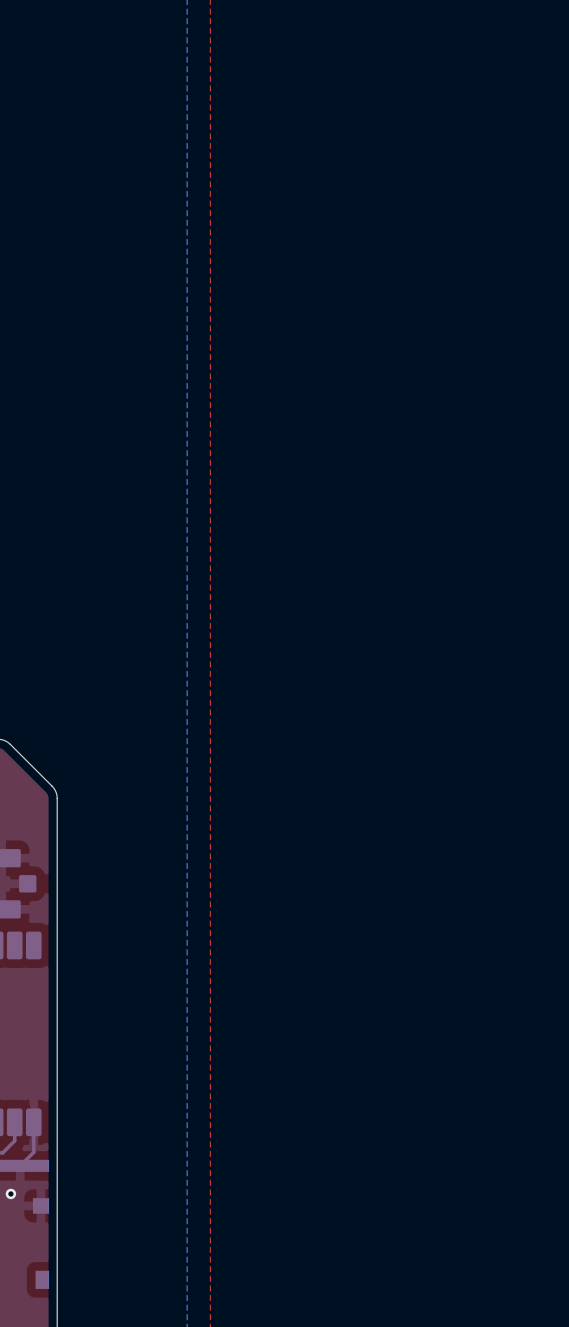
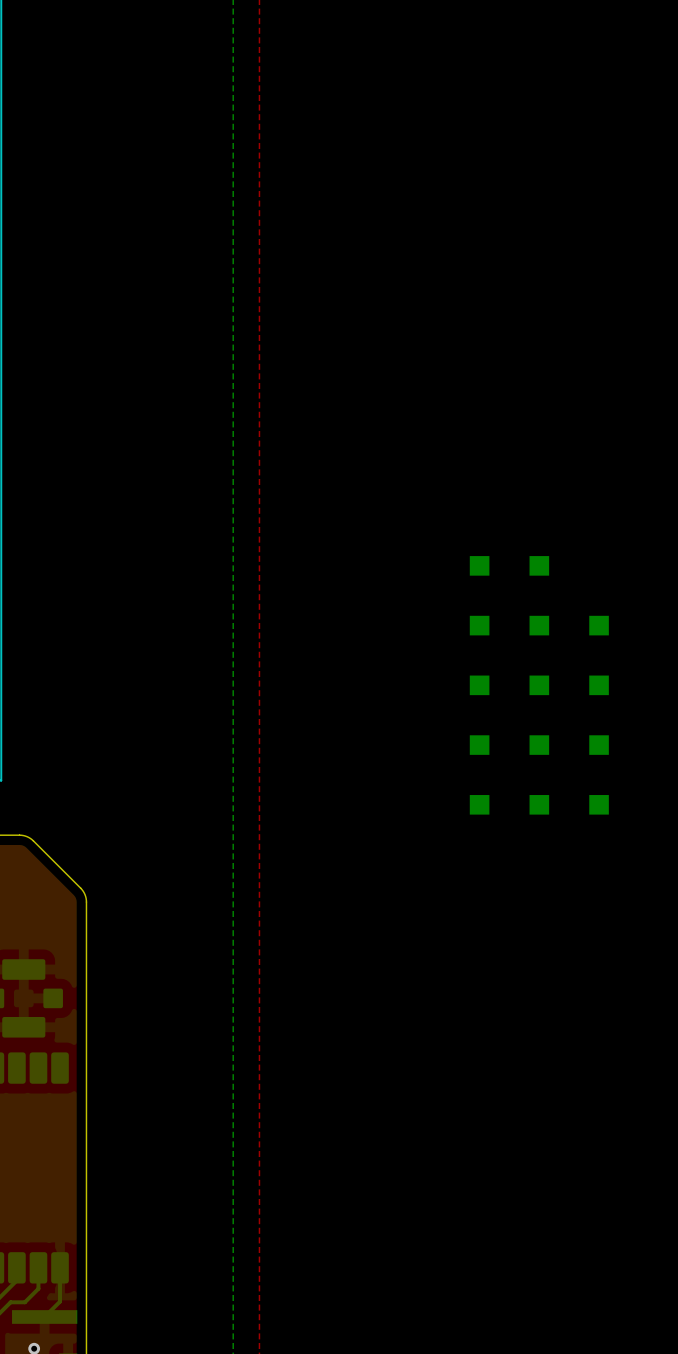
part: none -> (479, 565)
part: none -> (539, 565)
part: none -> (479, 625)
part: none -> (539, 625)
part: none -> (599, 625)
part: none -> (479, 685)
part: none -> (539, 685)
part: none -> (599, 685)
part: none -> (479, 745)
part: none -> (539, 745)
part: none -> (599, 745)
part: none -> (479, 804)
part: none -> (539, 804)
part: none -> (599, 804)

